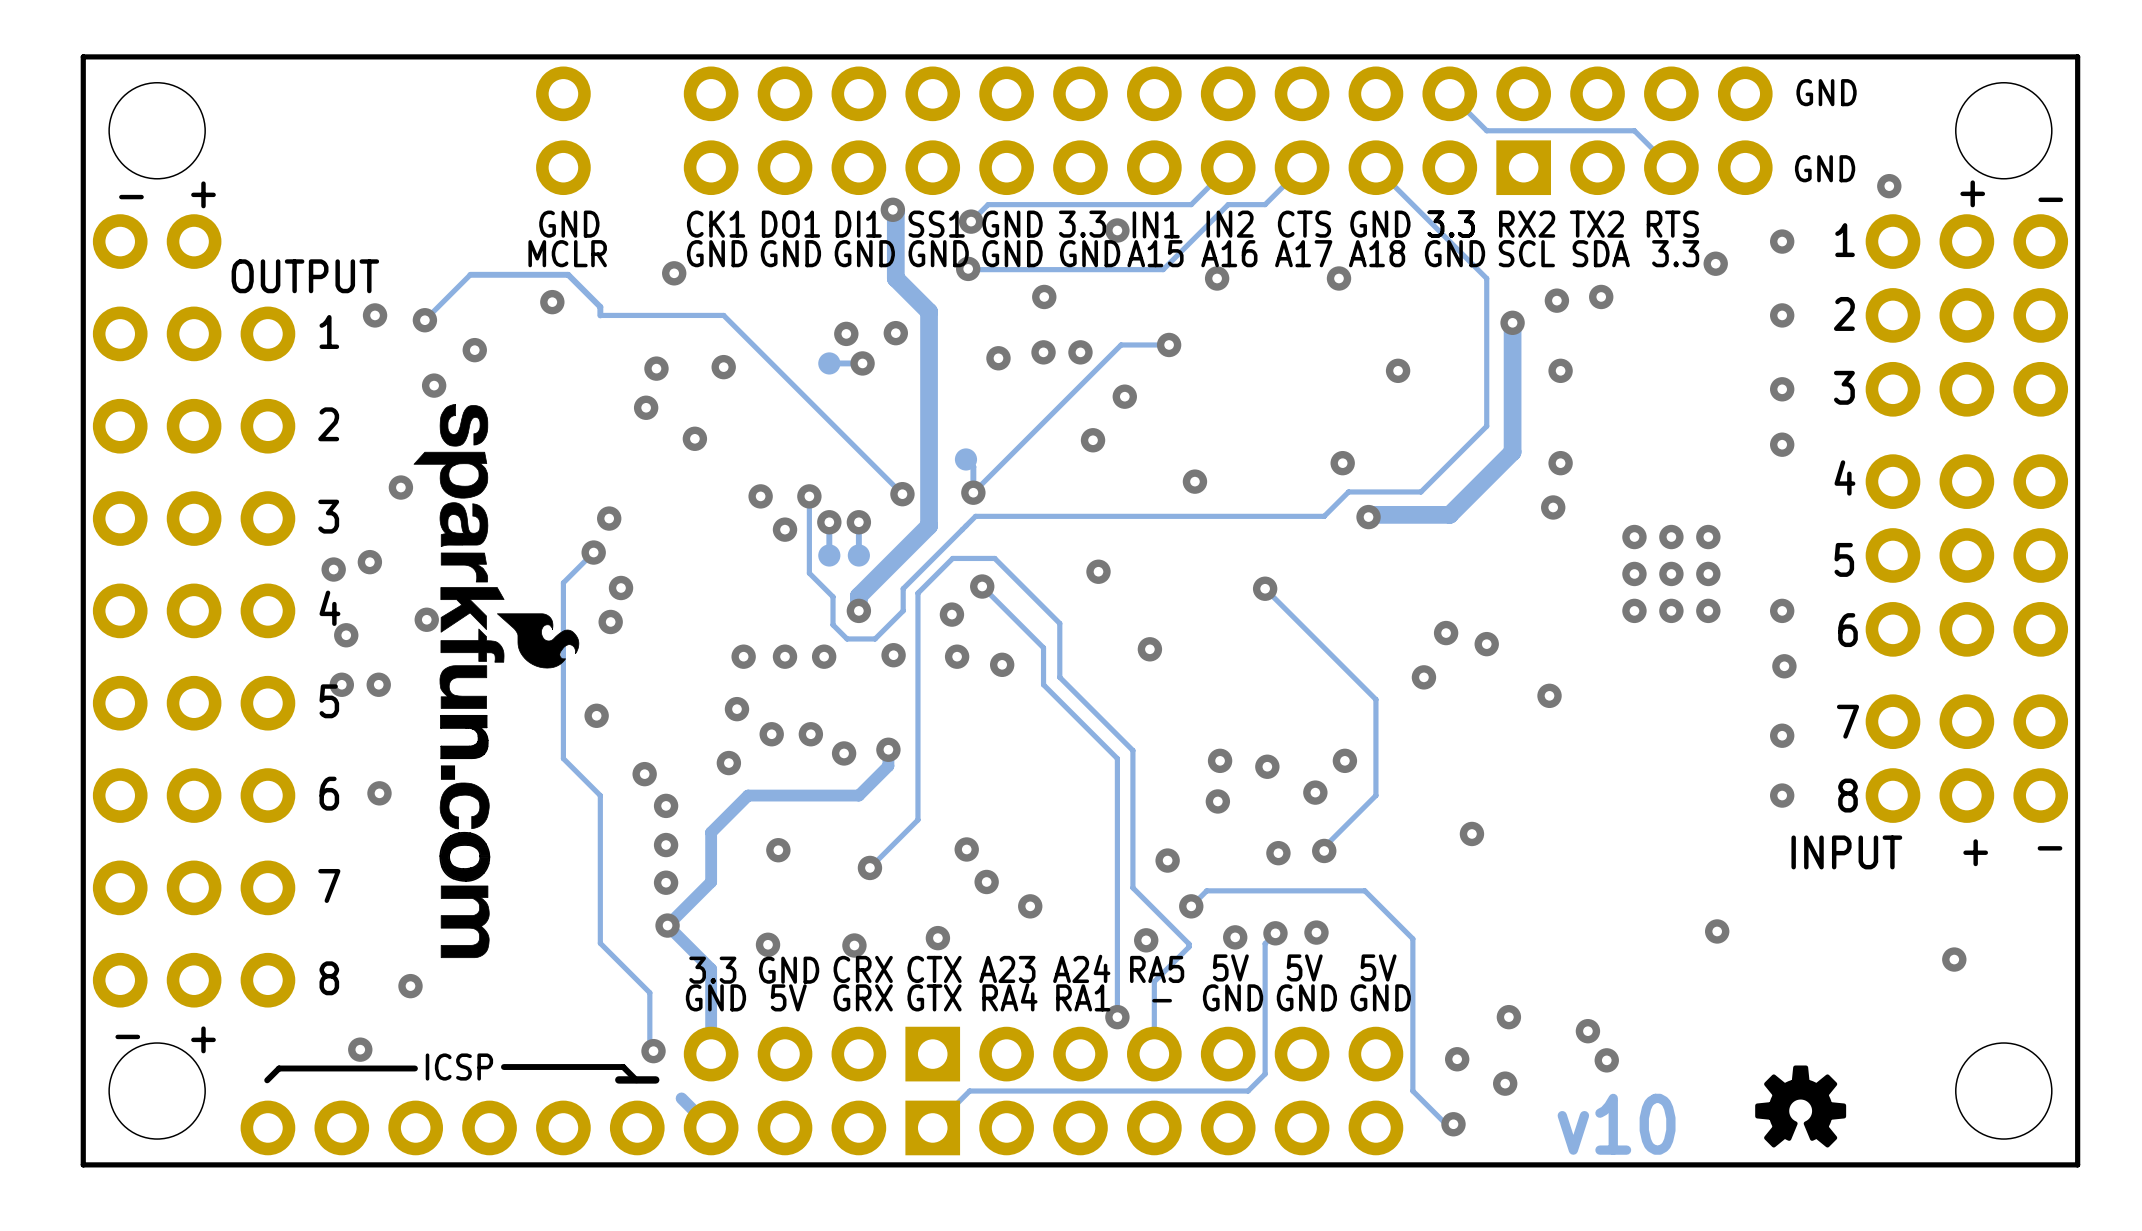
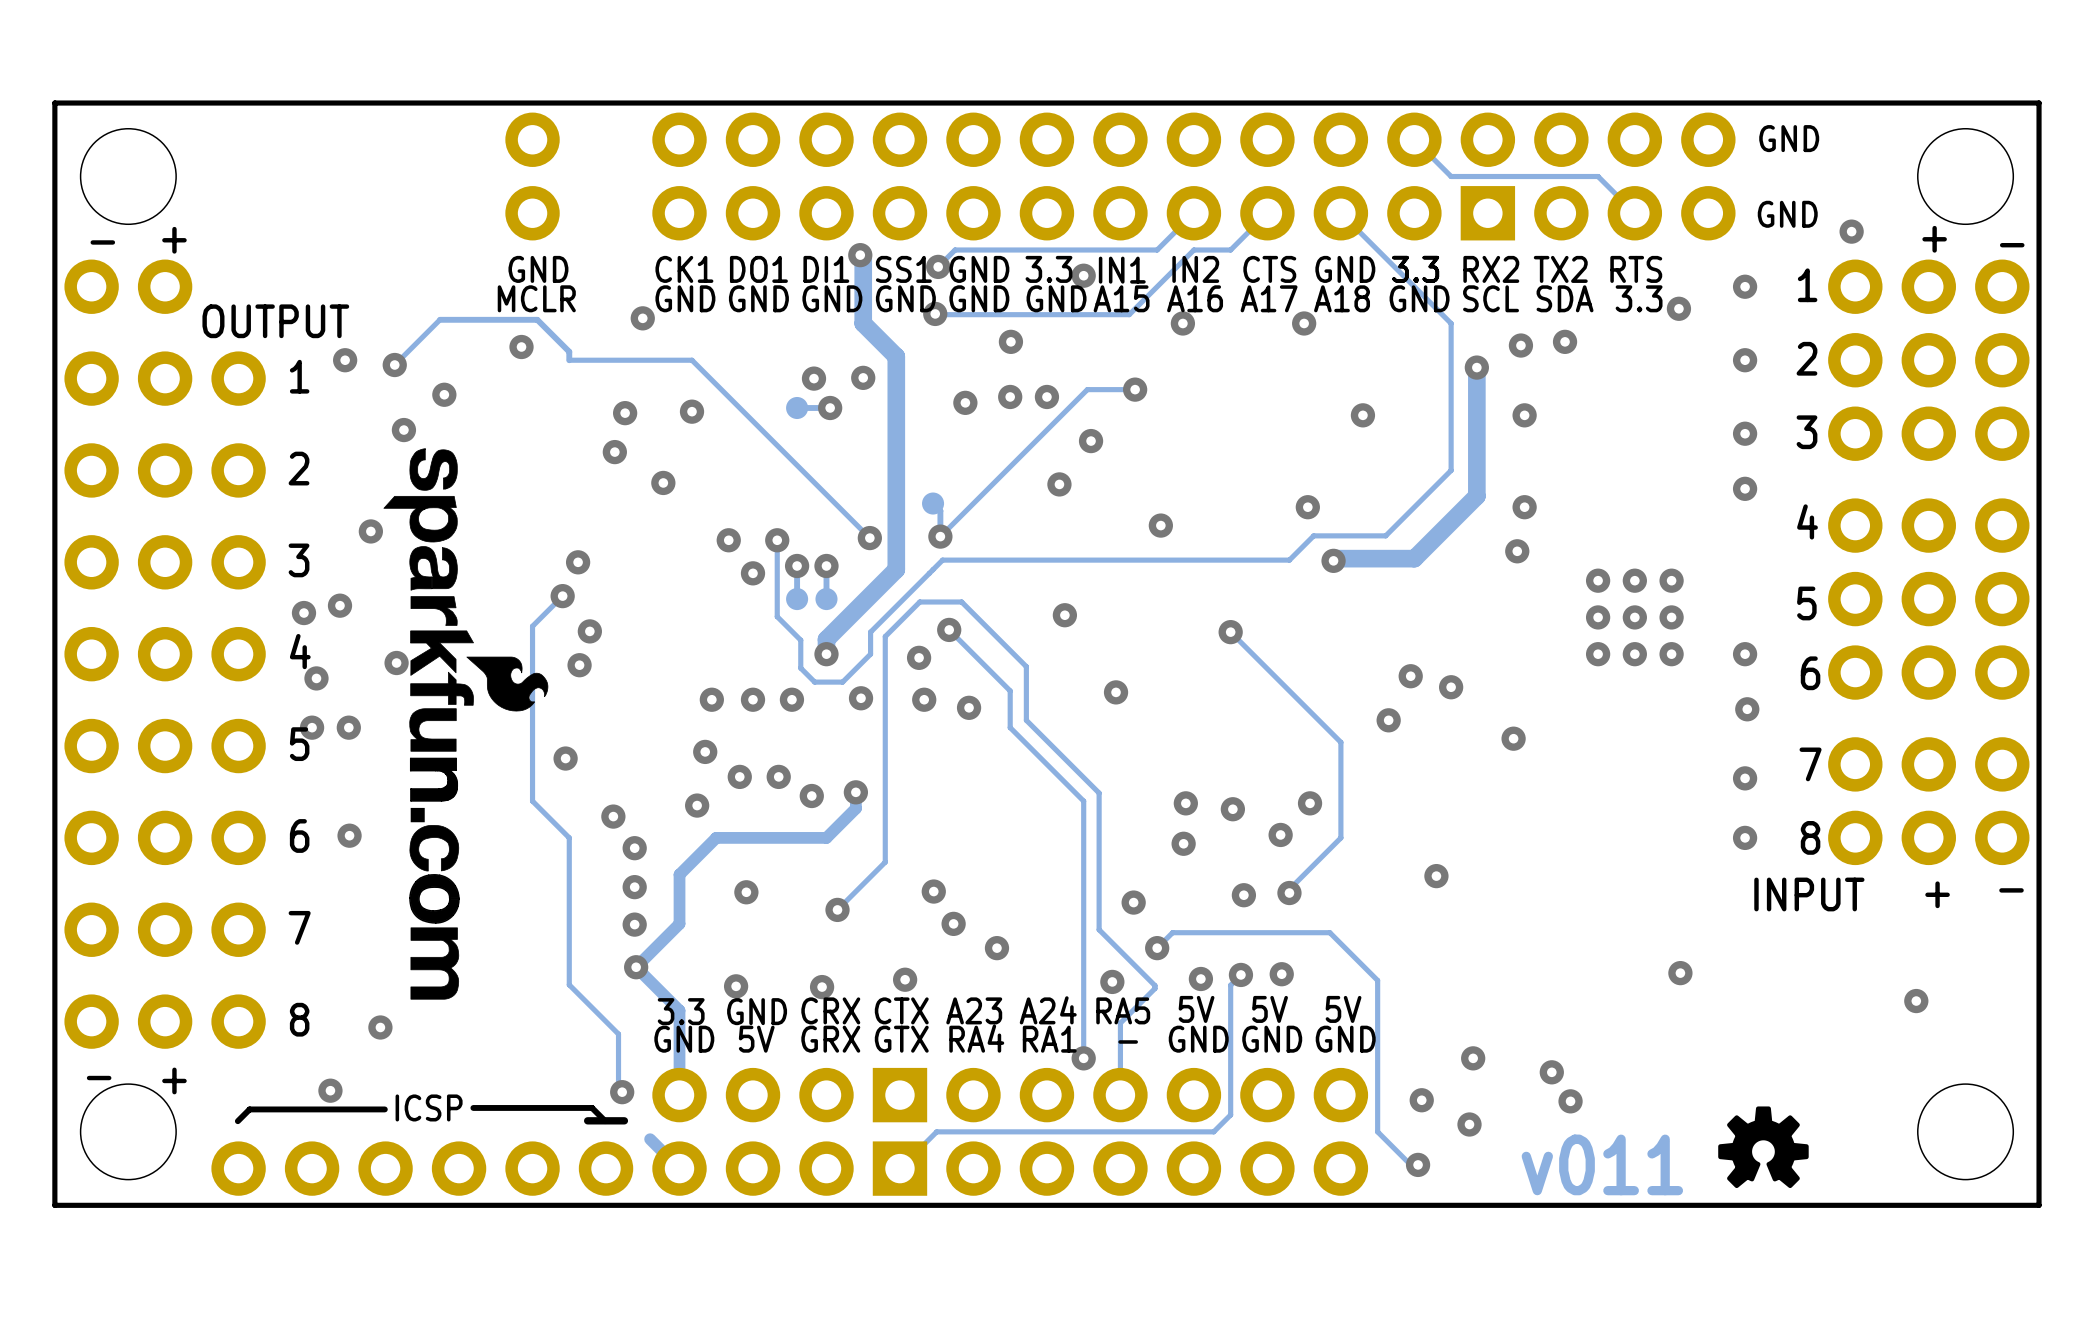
text: v10 (1616, 1124) -> v011 (1602, 1164)

